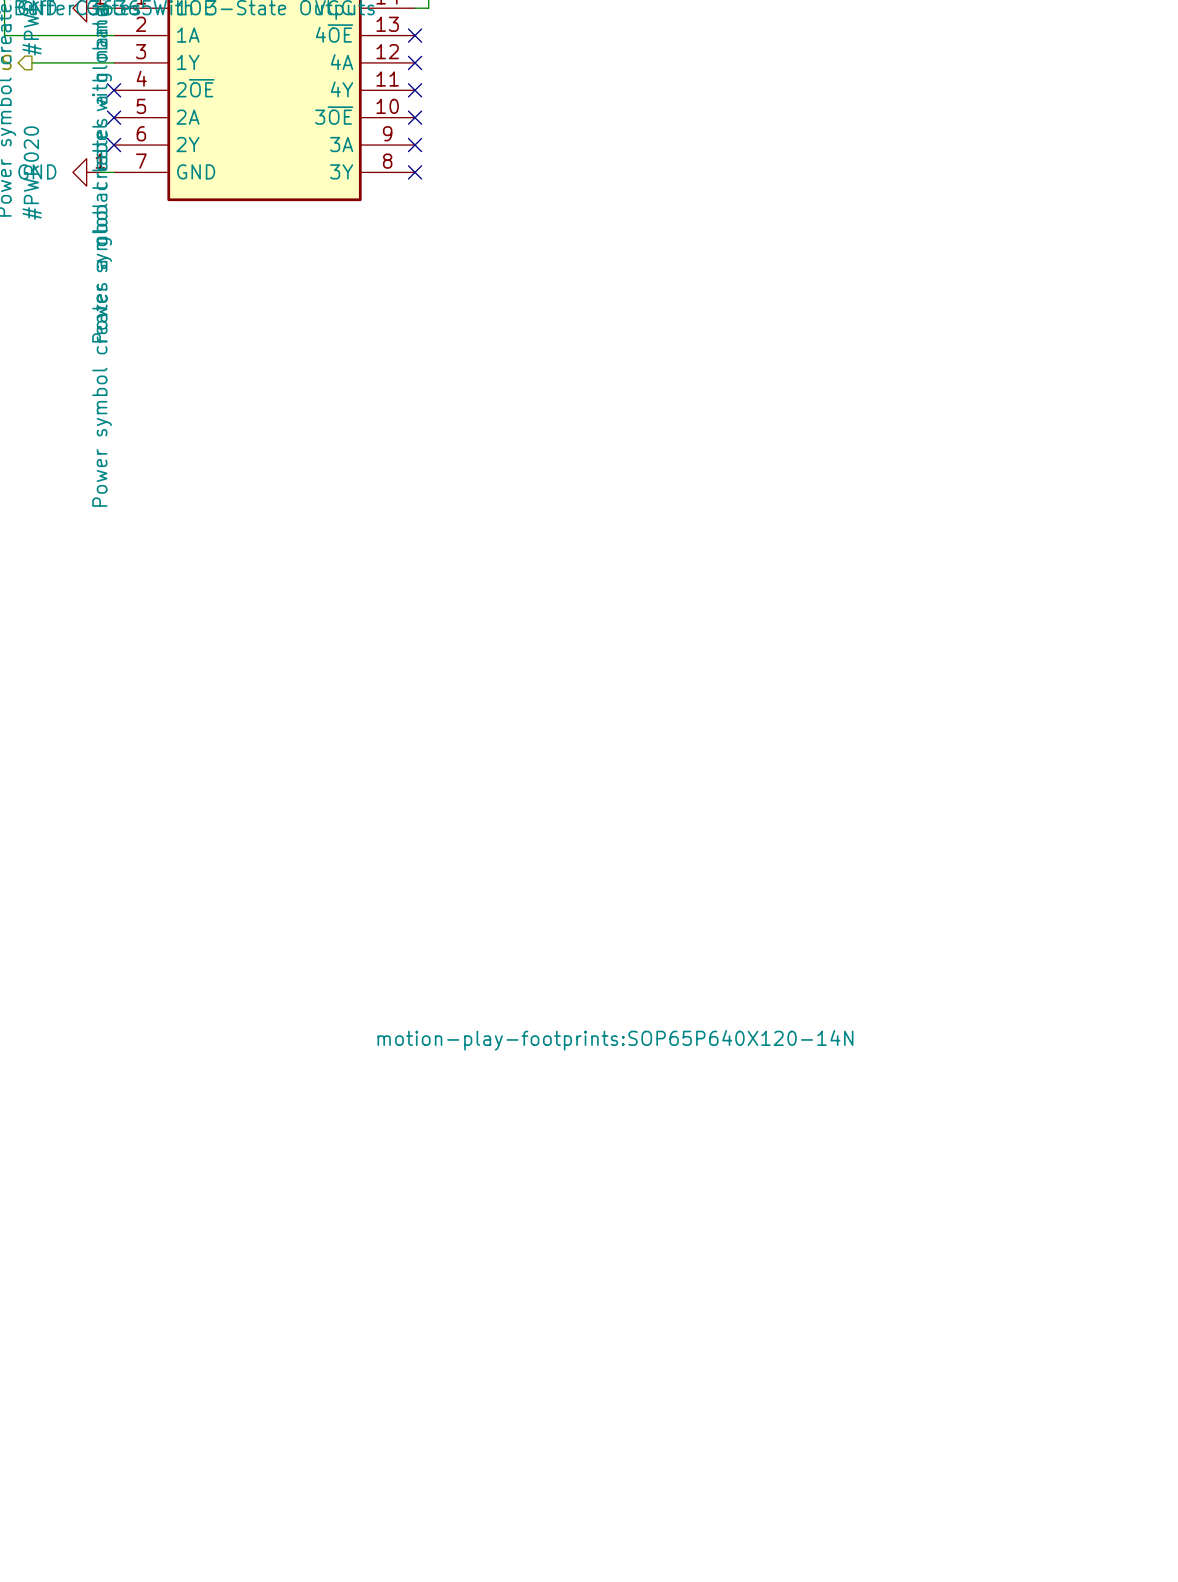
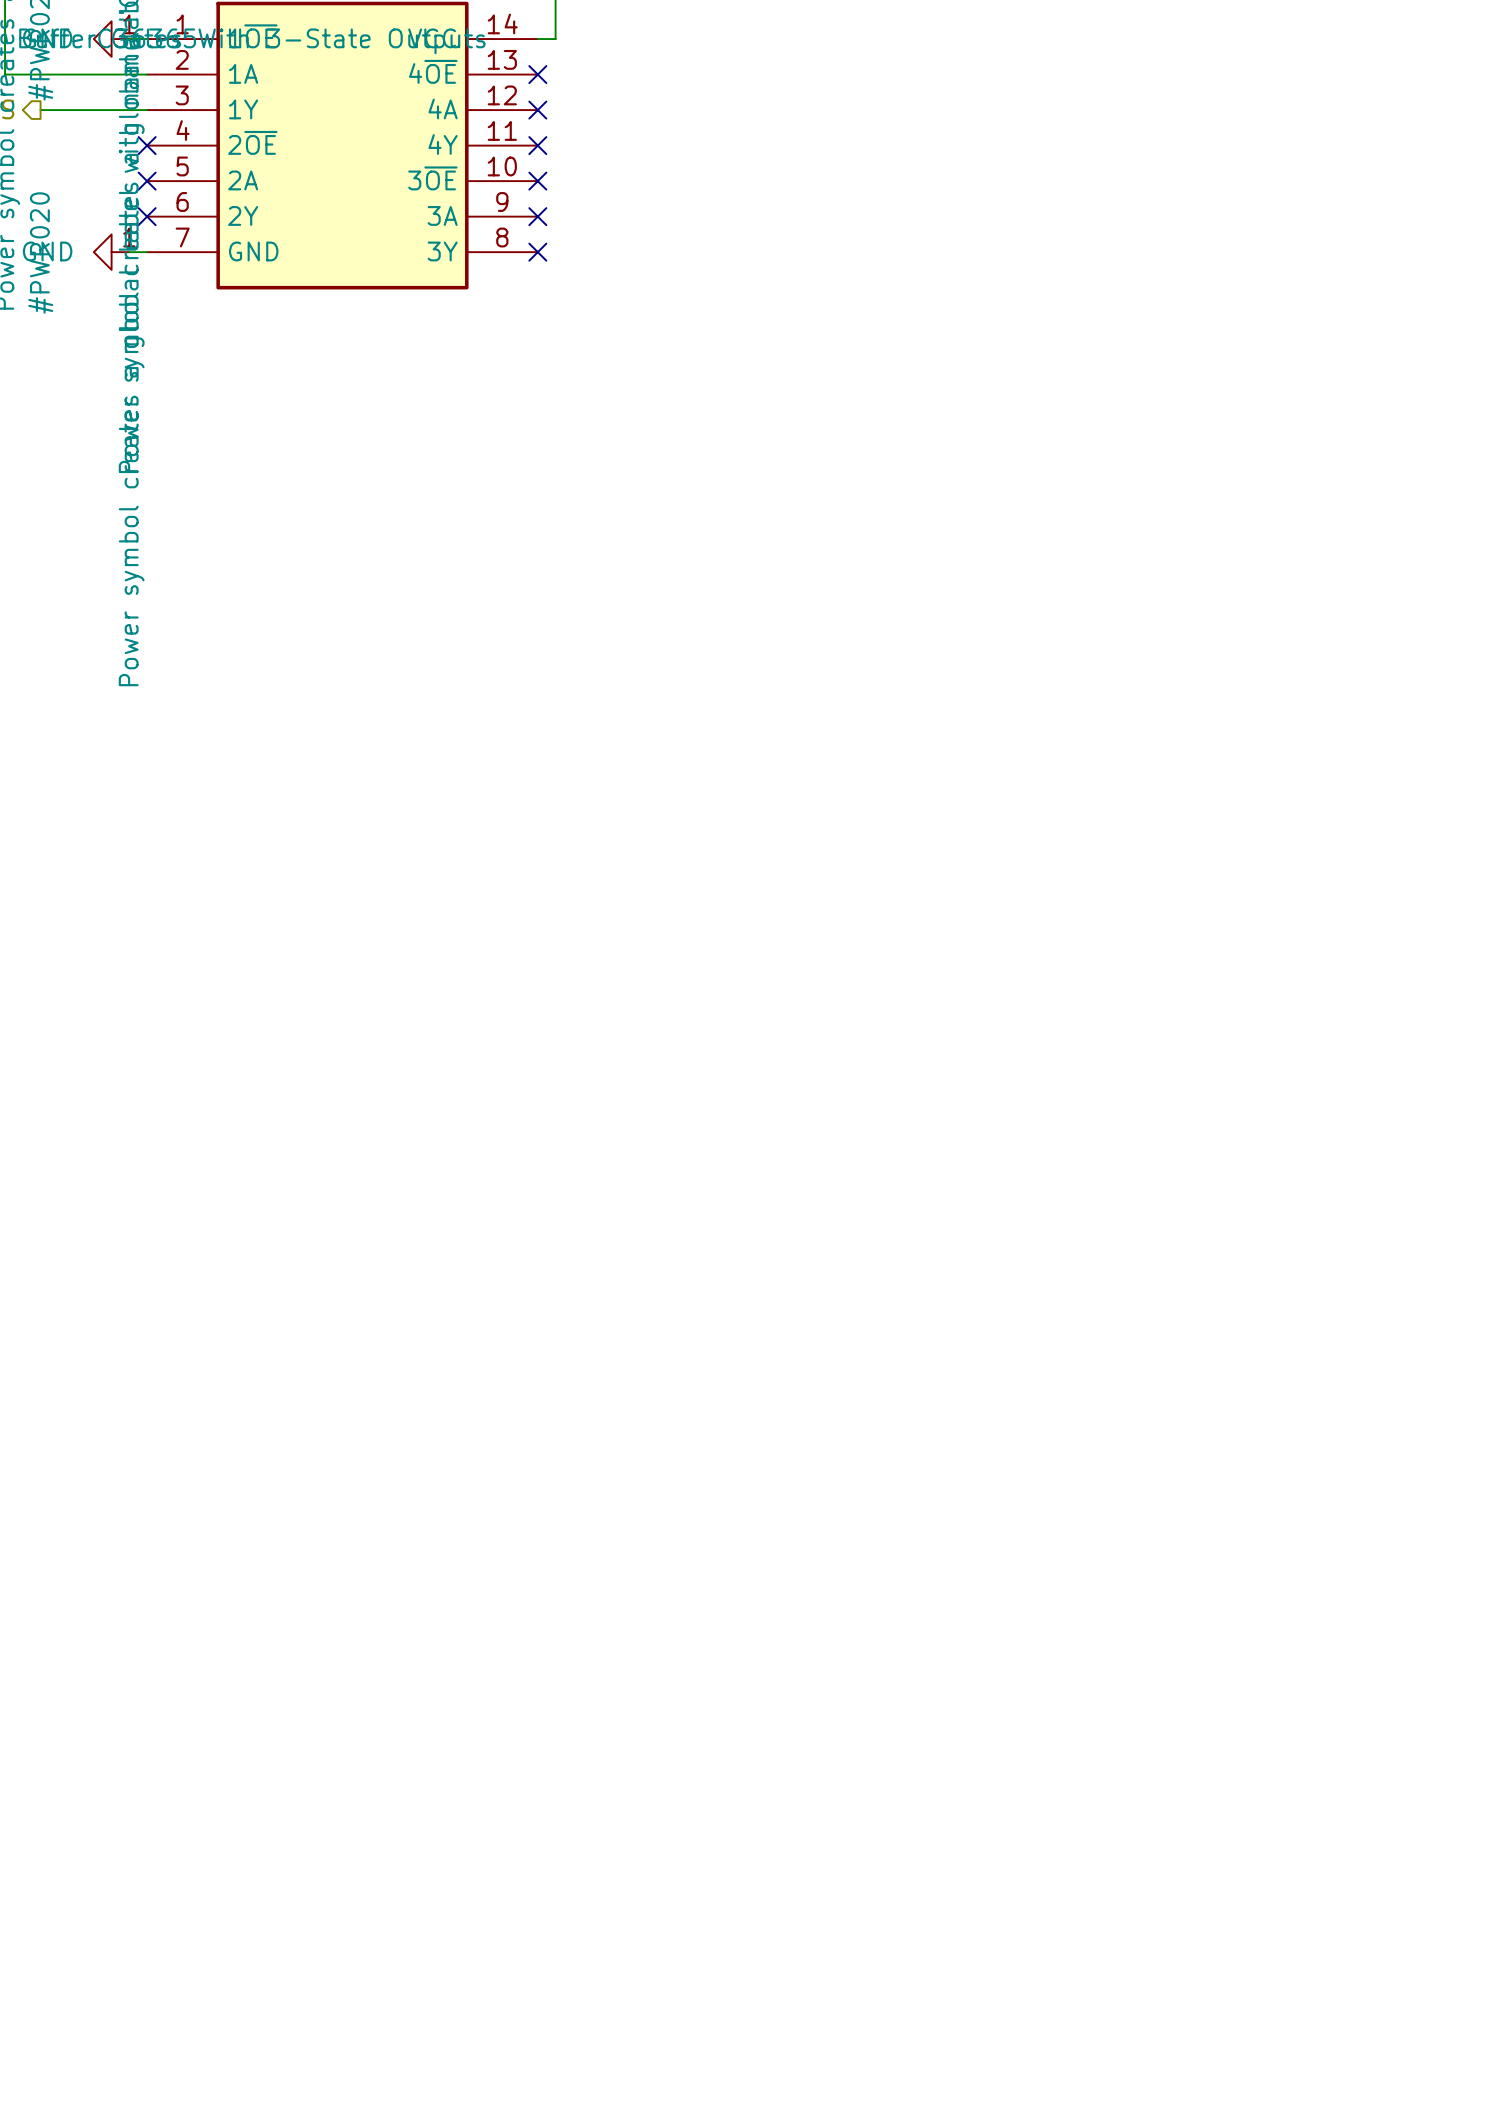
part text: motion-play-footprints:SOP65P640X120-14N (615, 1040) -> none

